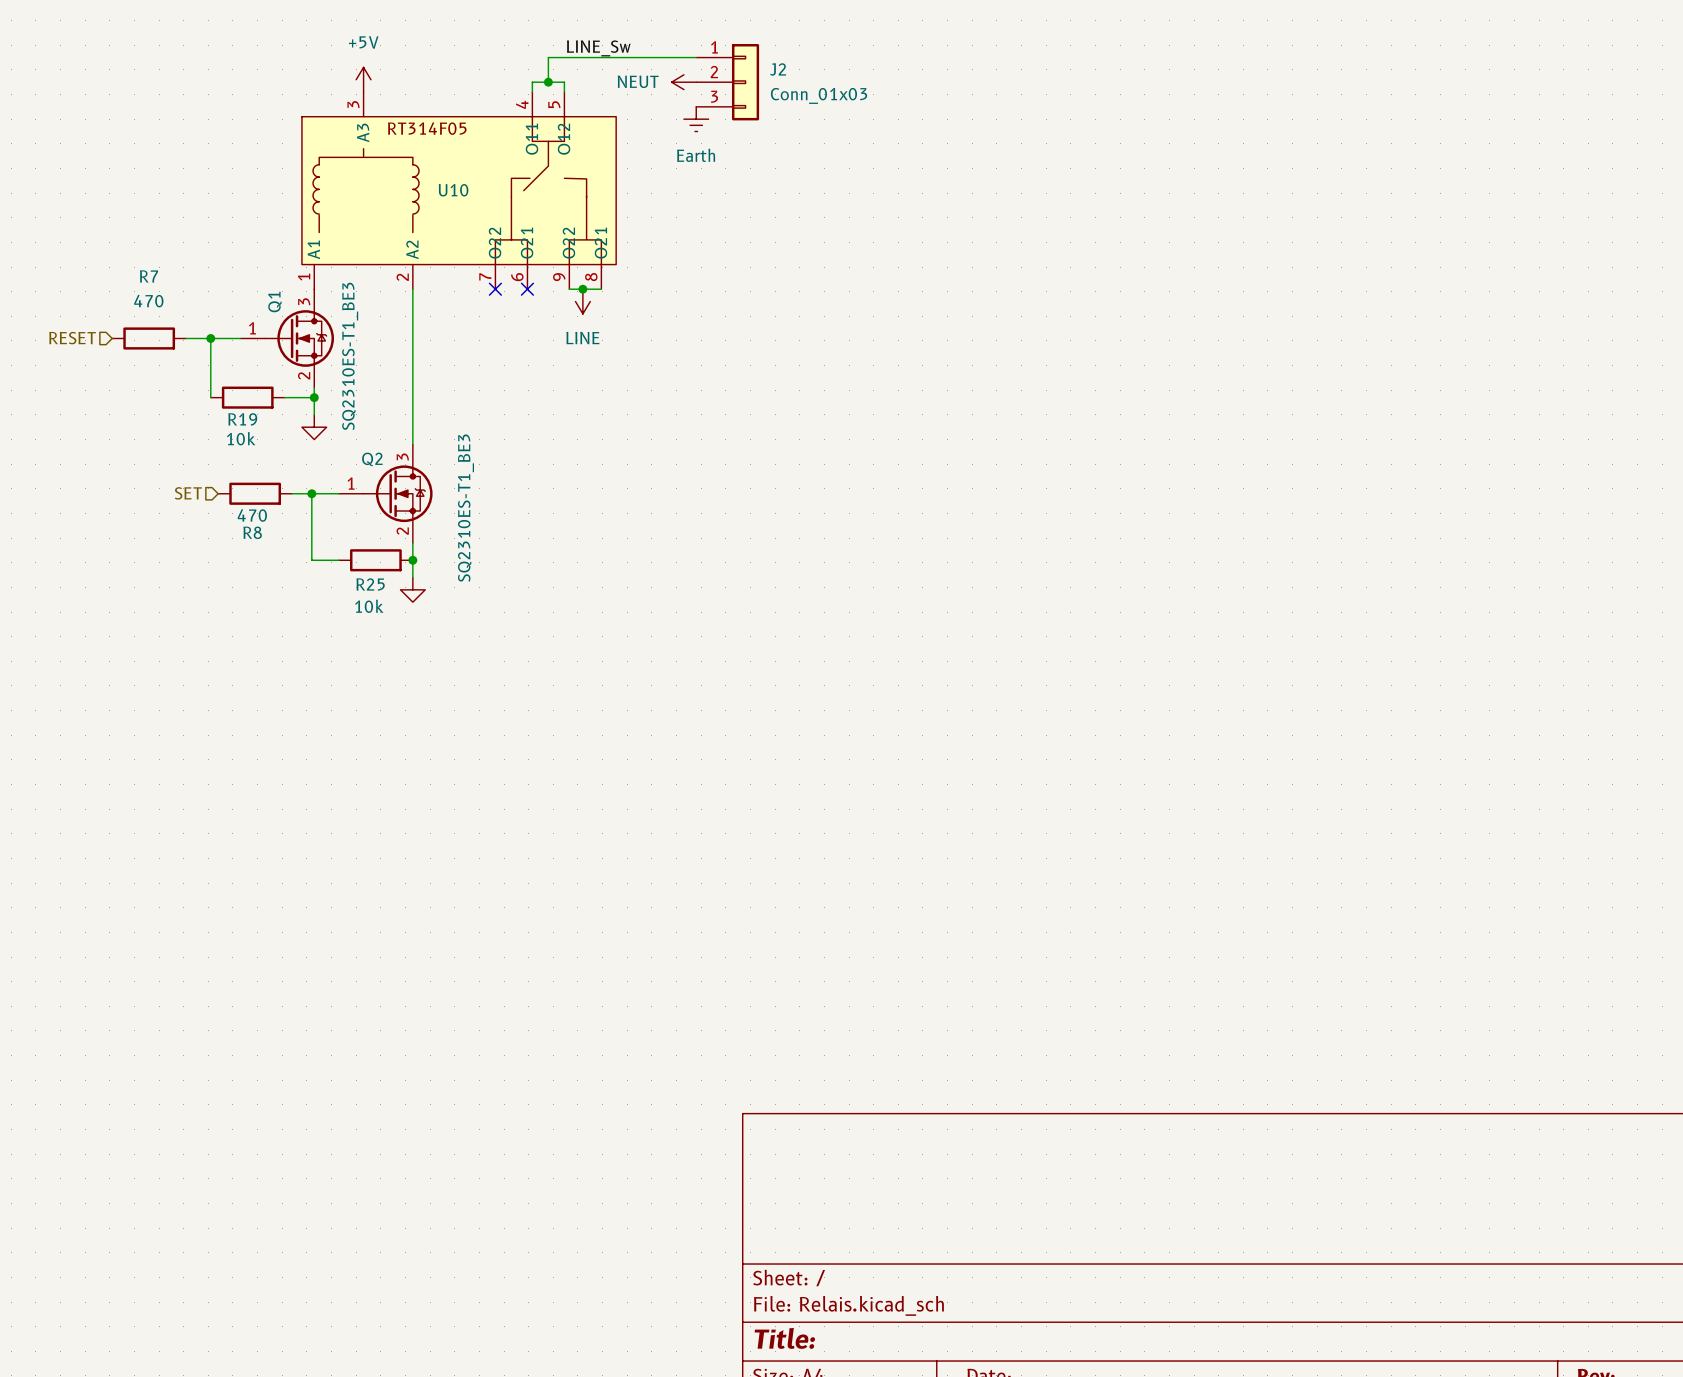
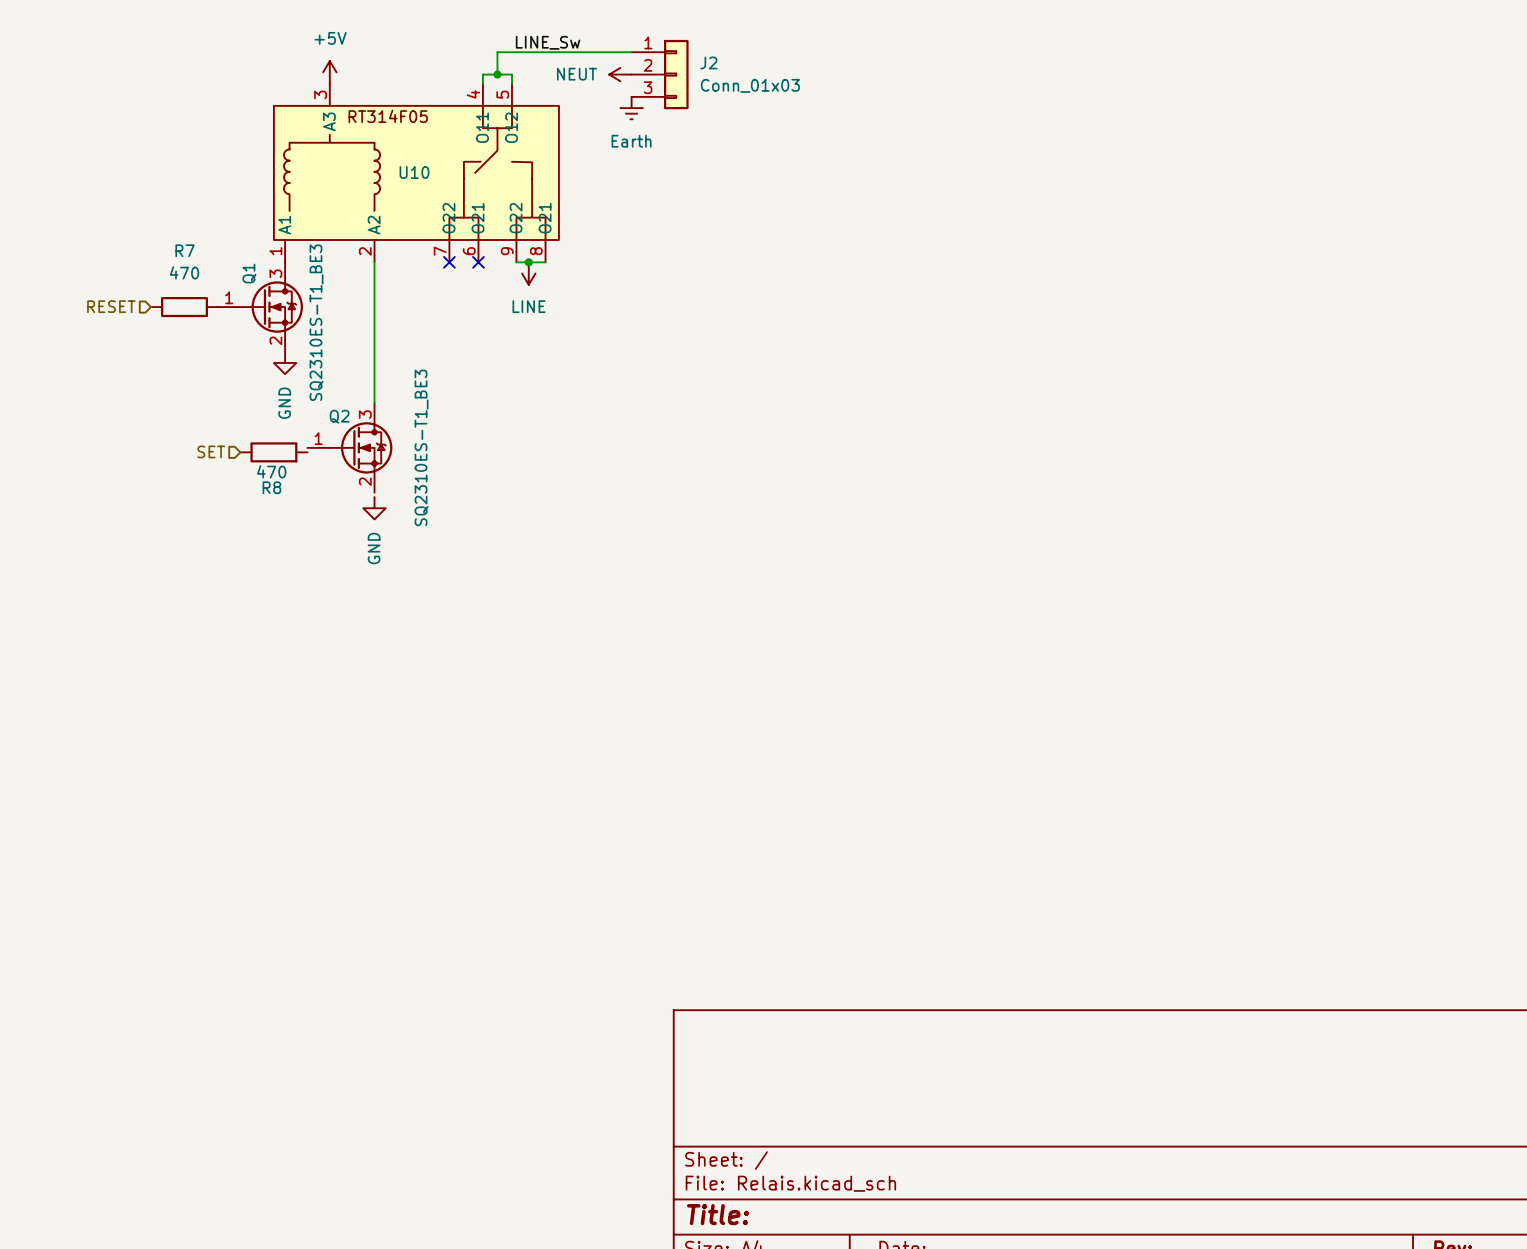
hierarchical label position: RESET (72, 338) -> RESET (111, 306)
R7 position: (149, 338) -> (184, 307)
wire: (186, 338) (240, 338) -> none
wire: (210, 338) (210, 397) -> none
junction: (210, 338) -> none
R19: 10k (247, 397) -> none
wire: (284, 397) (314, 397) -> none
junction: (314, 397) -> none
power symbol: none -> GND (285, 362)
power symbol: (314, 427) -> none
hierarchical label position: SET (188, 493) -> SET (211, 451)
R8 position: (255, 493) -> (273, 452)
wire: (292, 493) (338, 493) -> none
wire: (311, 493) (311, 560) (338, 560) -> none
junction: (311, 493) -> none
wire: (412, 543) (412, 577) -> none
R25: 10k (375, 560) -> none
junction: (412, 560) -> none
power symbol: none -> GND (374, 508)
power symbol: (412, 589) -> none

